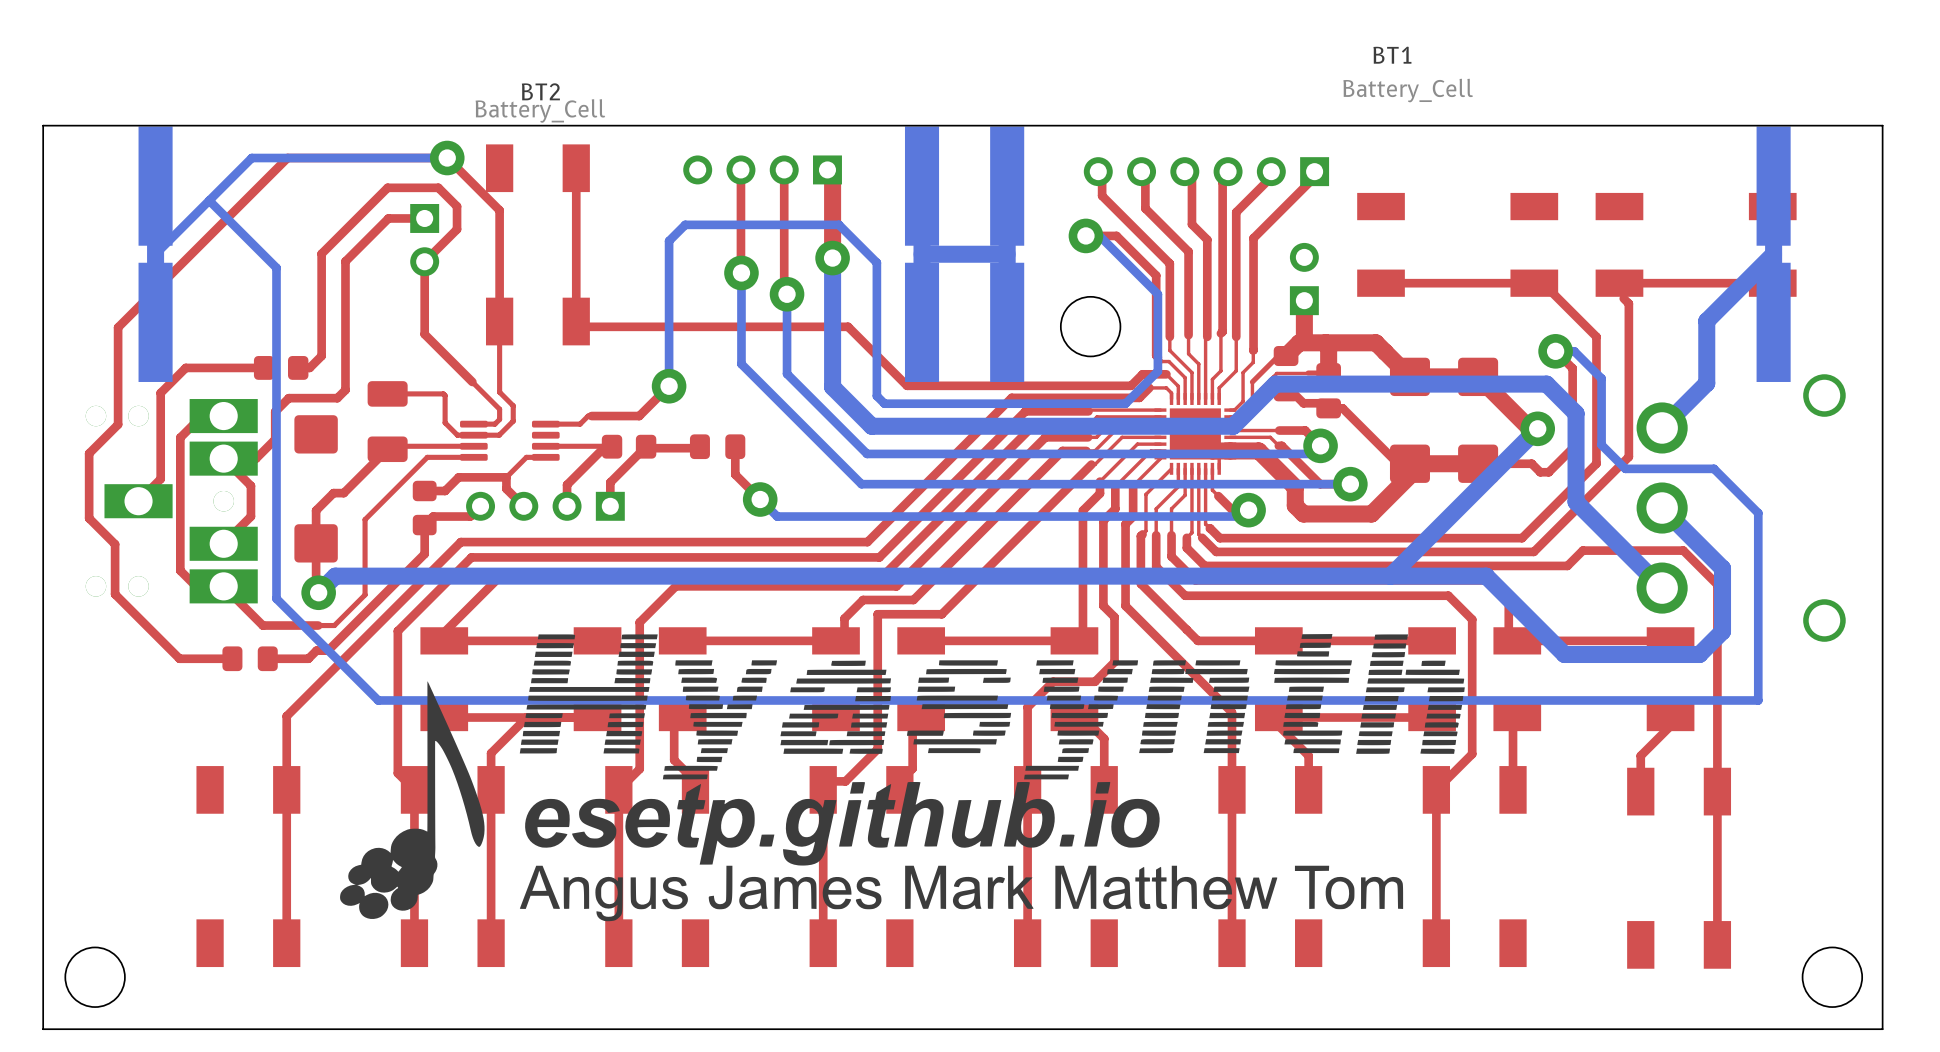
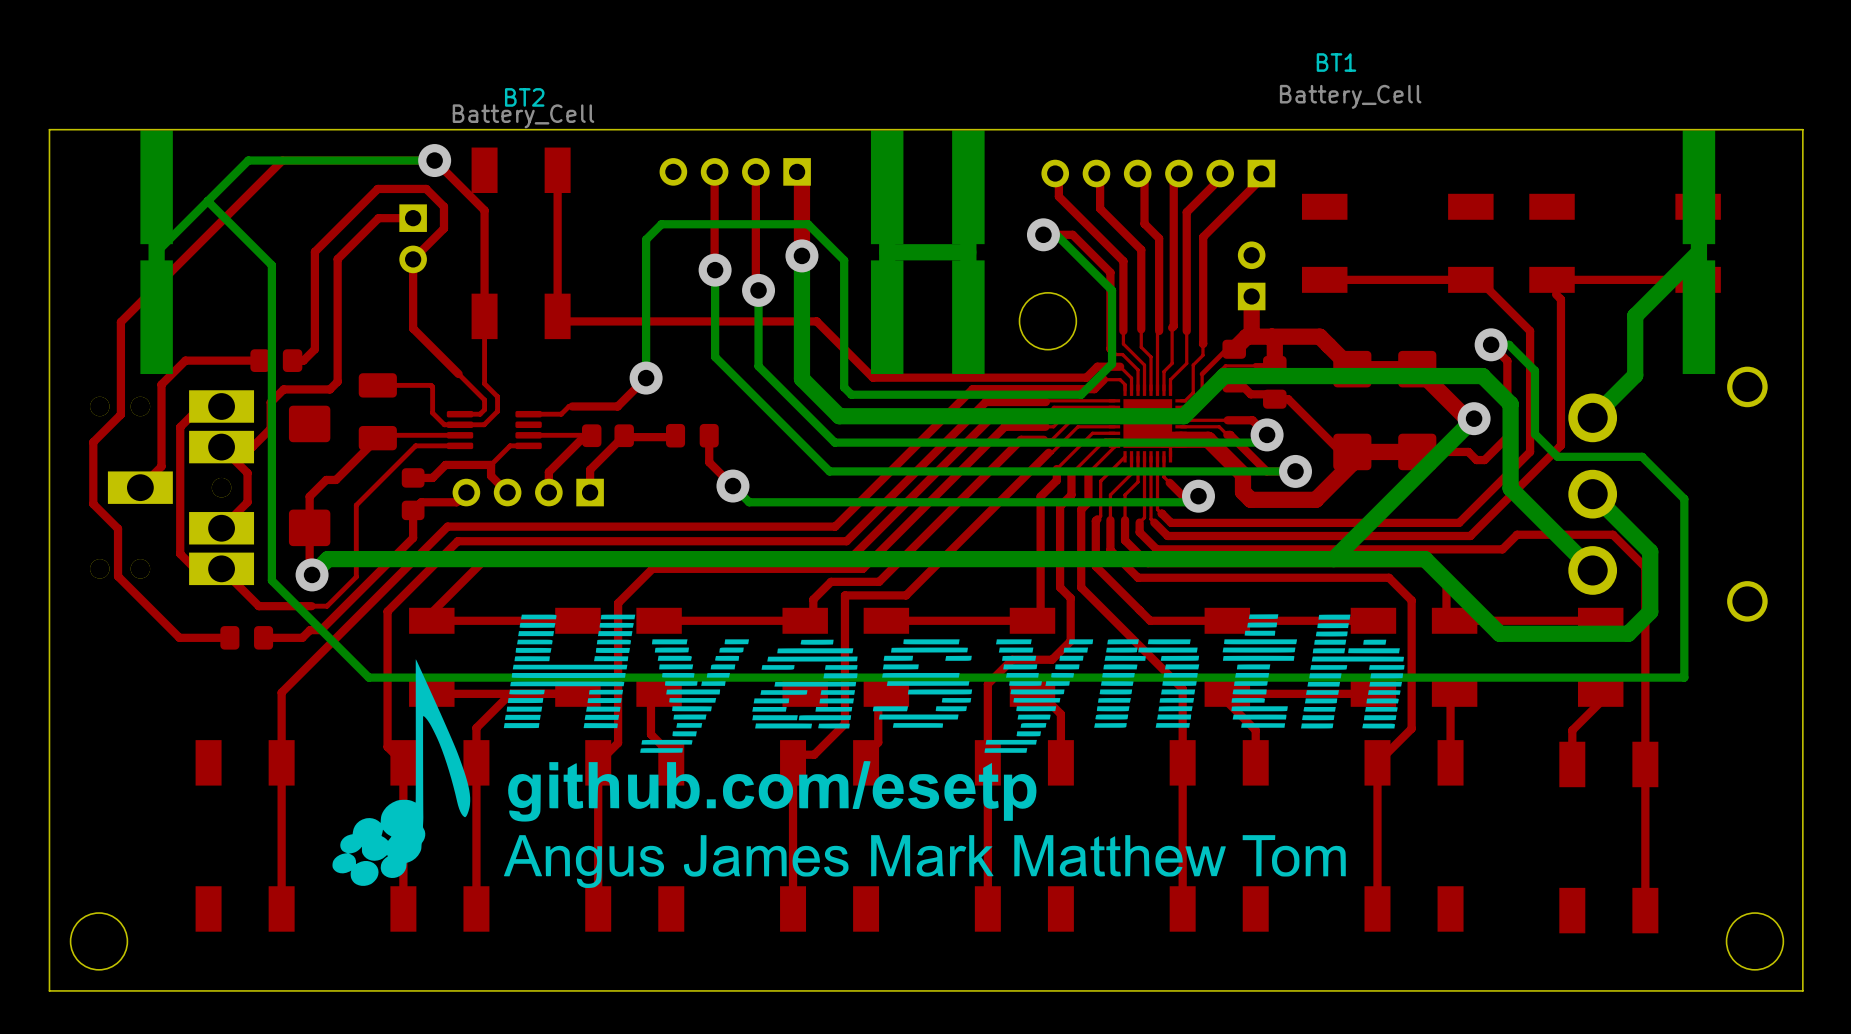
drawing shape: [340, 634, 1465, 922] -> [332, 614, 1405, 888]

